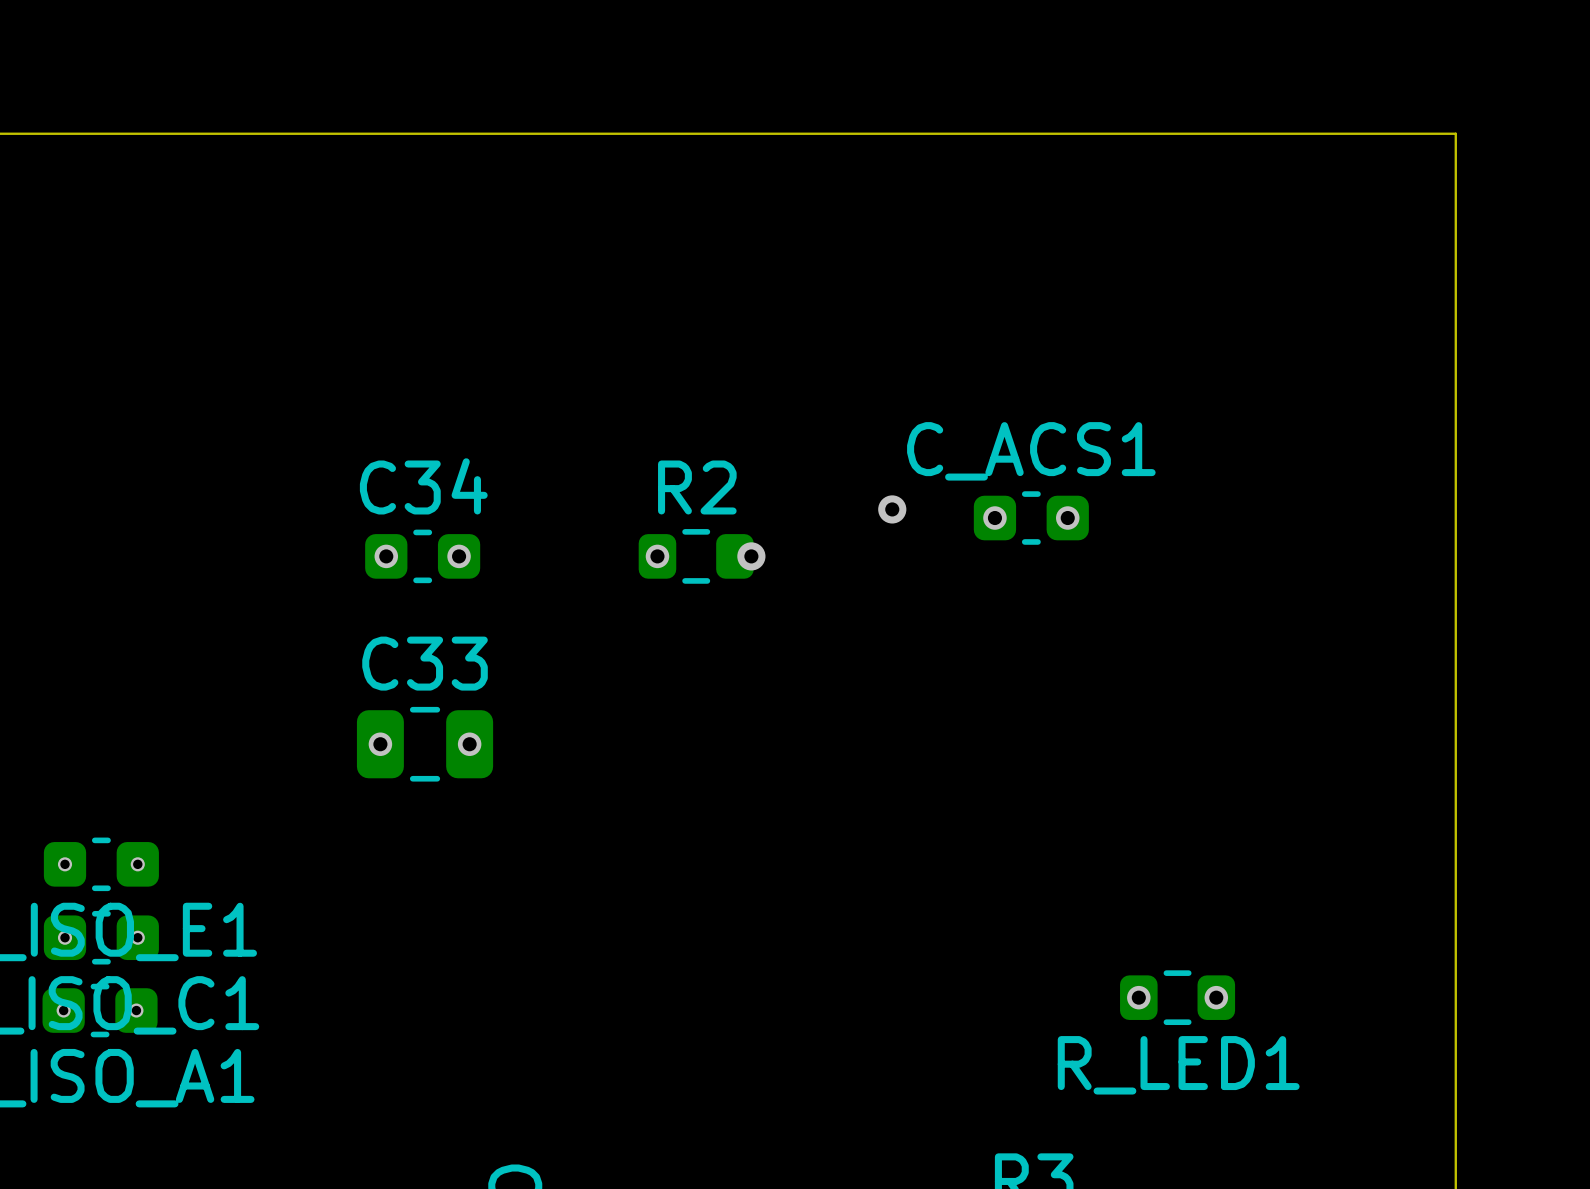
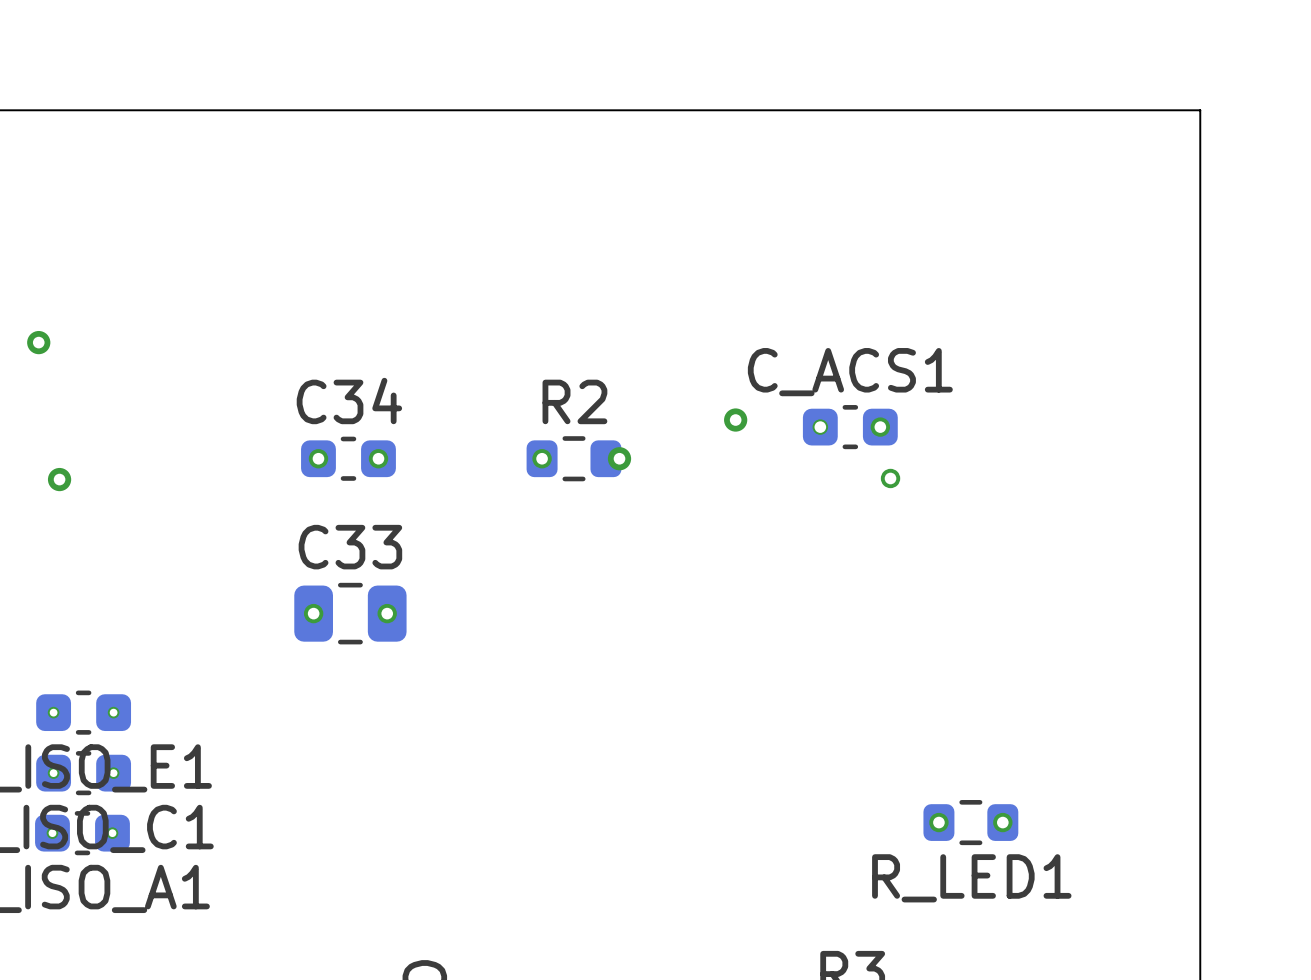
via: none -> (38, 342)
via position: (994, 518) -> (890, 478)
via: none -> (820, 427)
via: none -> (59, 479)

